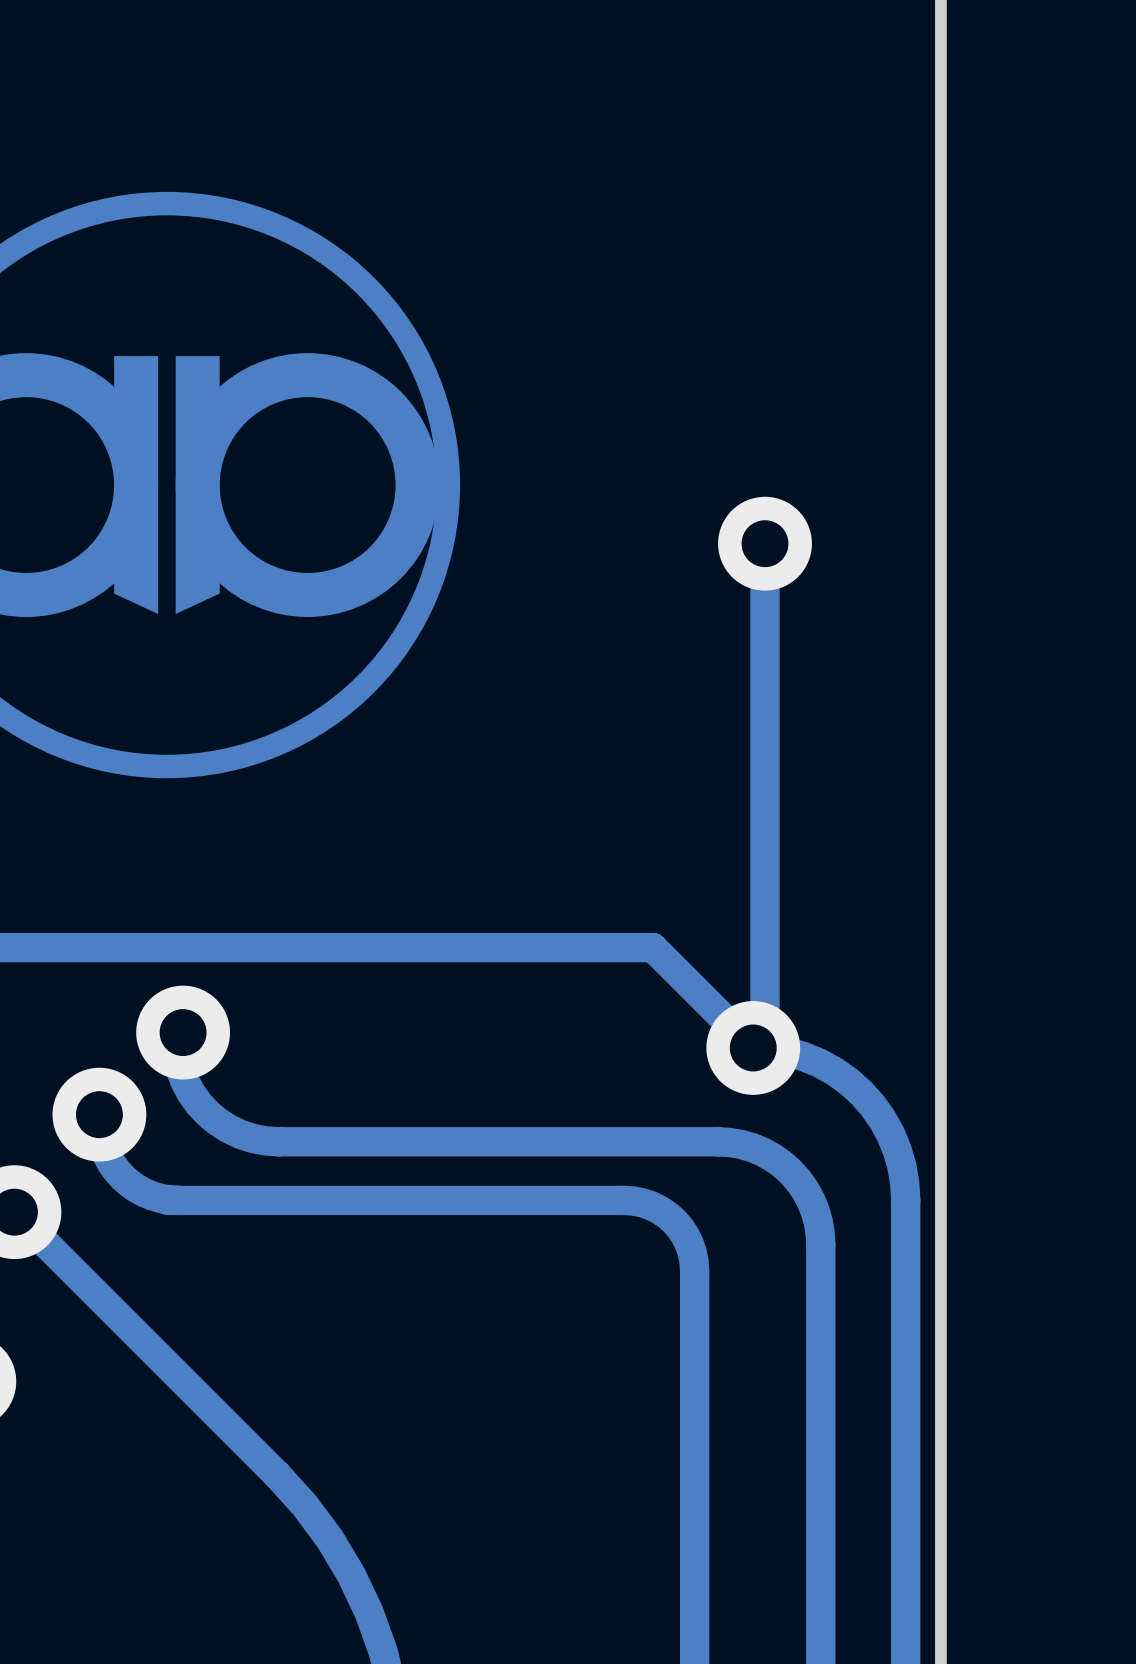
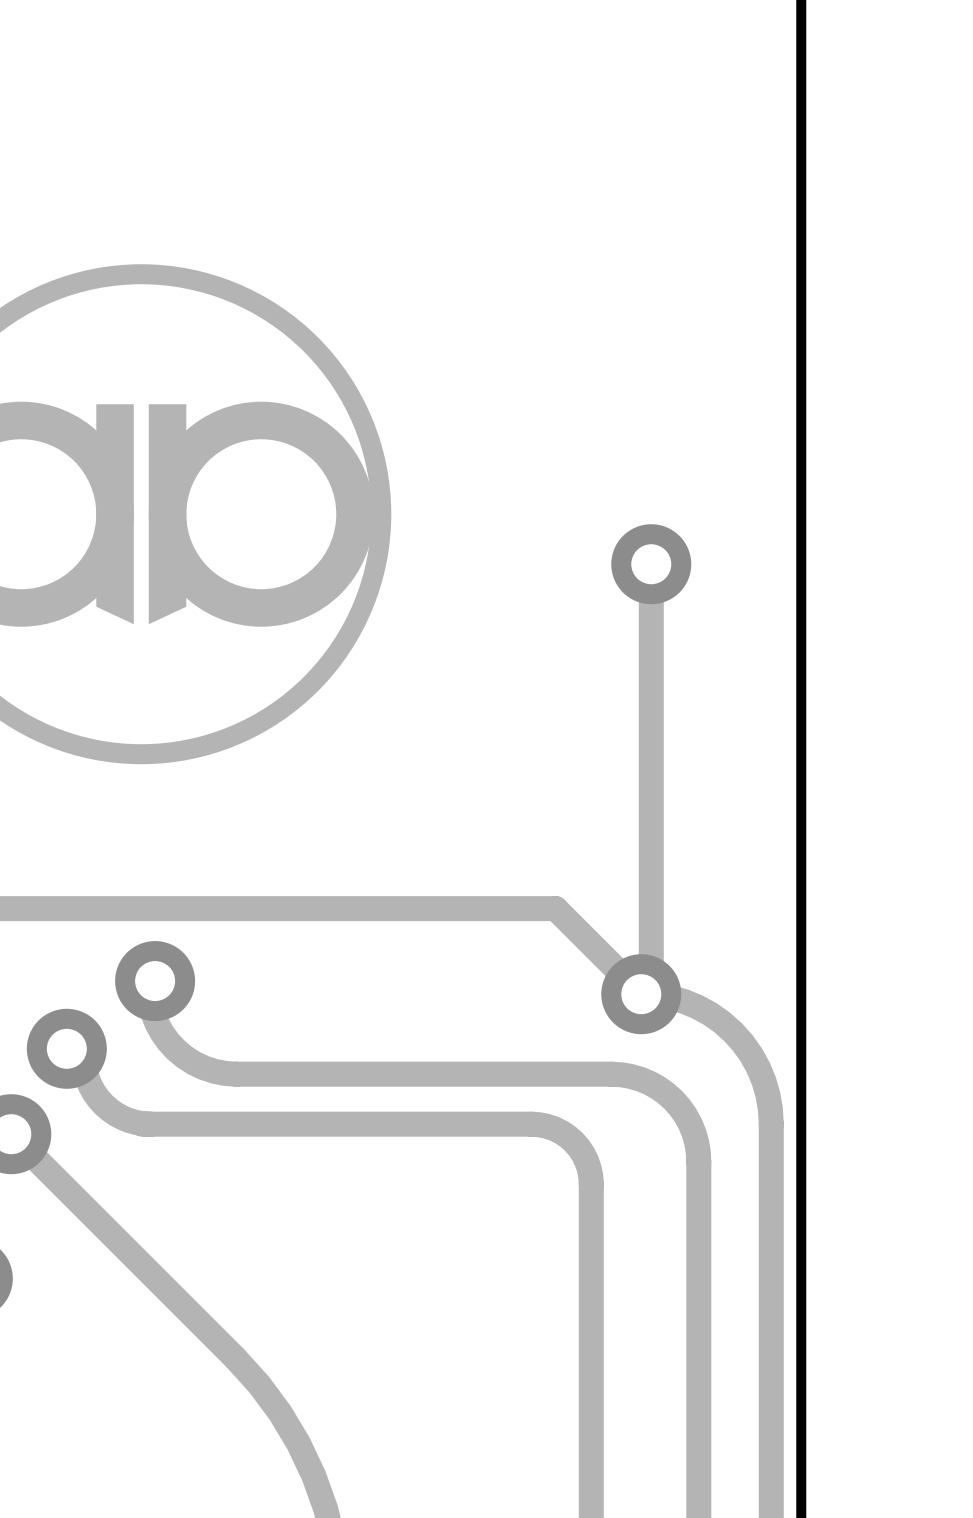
via position: (99, 1114) -> (66, 1048)

